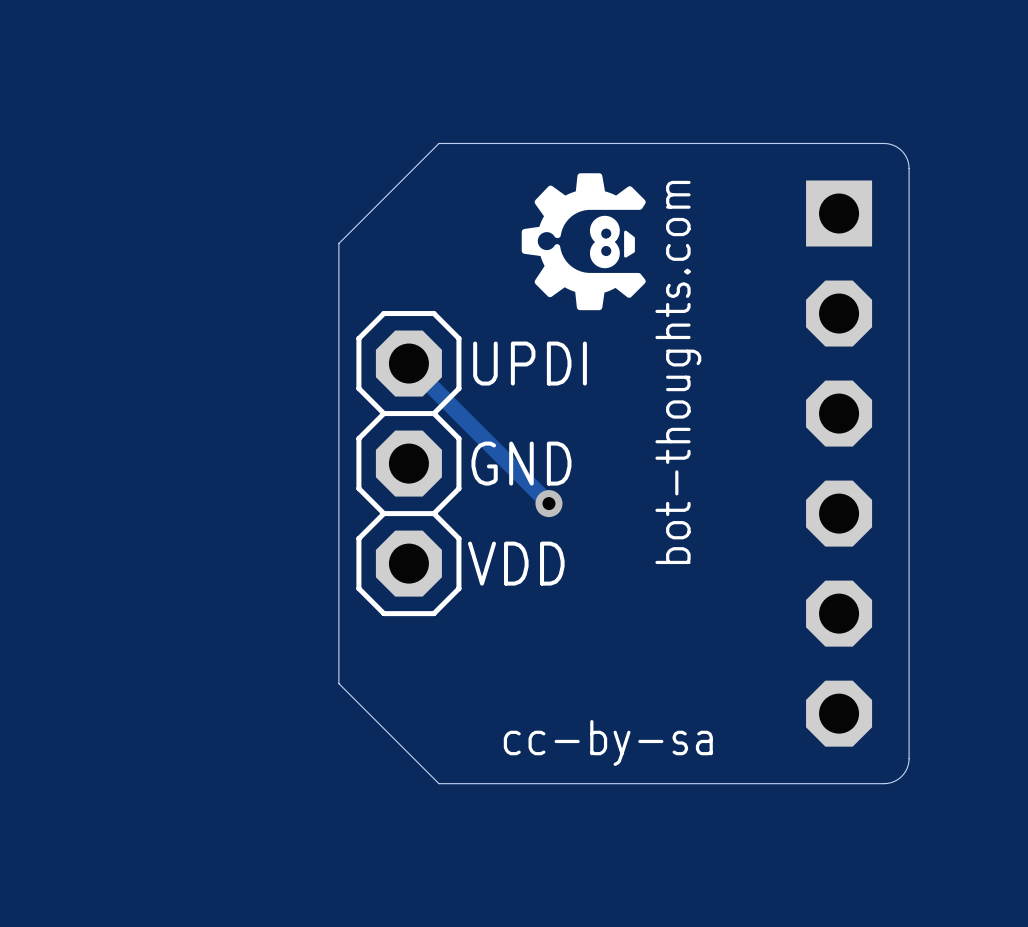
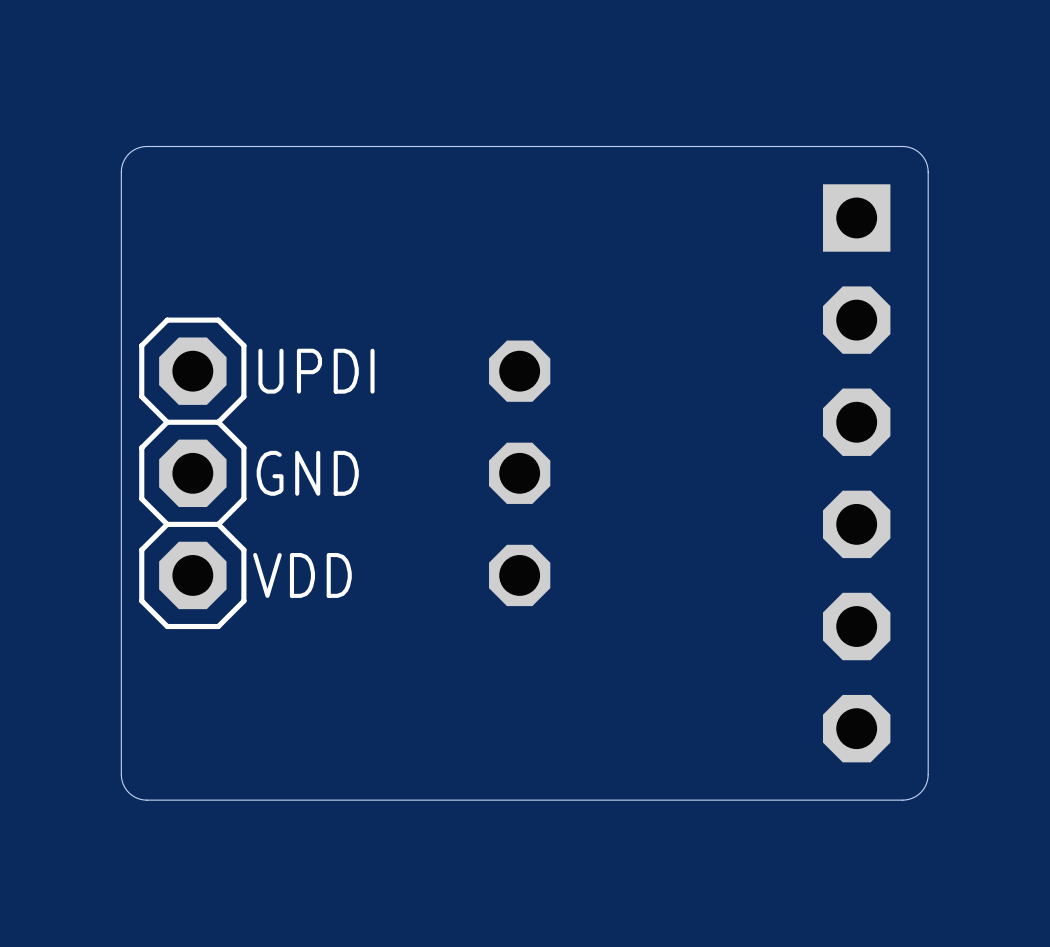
board edge: (438, 143) (338, 243) (338, 683) (438, 783) -> (448, 146) (143, 146) (134, 149) (126, 156) (121, 172) (121, 774) (124, 787) (134, 796) (146, 800) (448, 800)
drawing: [521, 173, 646, 311] -> none
track: (408, 363) (548, 503) -> none
text: bot-thoughts.com (678, 372) -> none
part position: (408, 463) -> (192, 473)
part: none -> (519, 473)
via: (548, 503) -> none
text: cc-by-sa (608, 742) -> none

